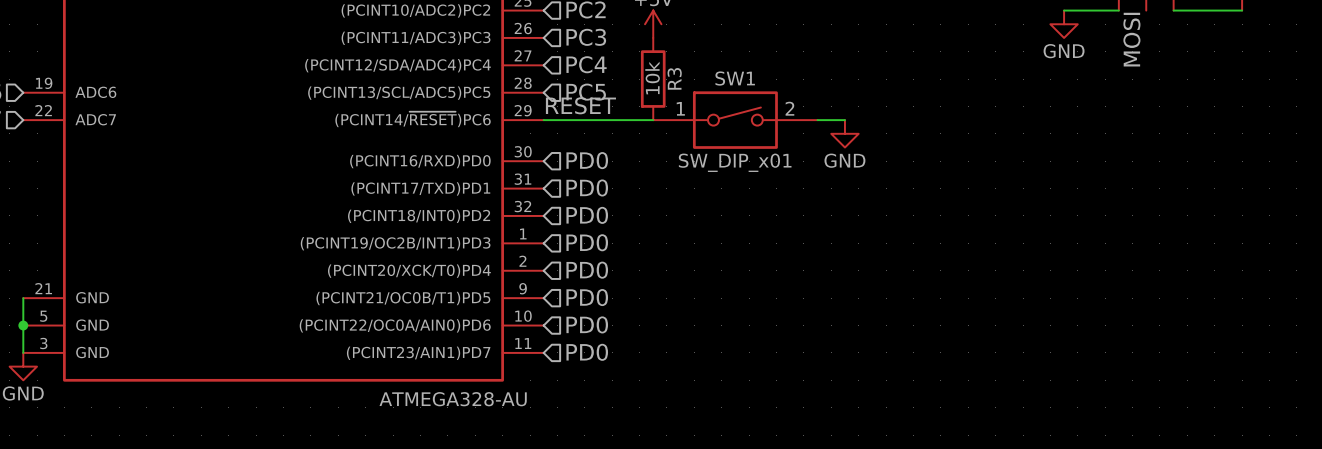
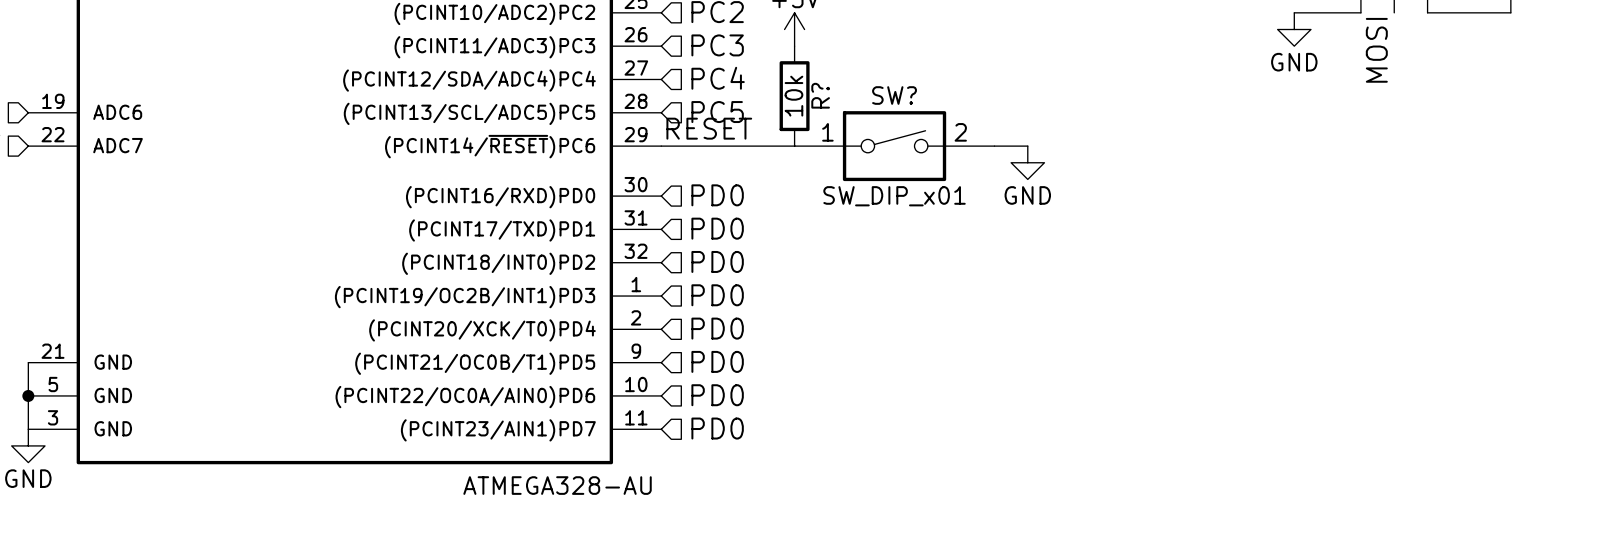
R3 name: R3 (674, 78) -> R? (820, 95)
SW1 name: SW1 (735, 78) -> SW? (894, 95)

